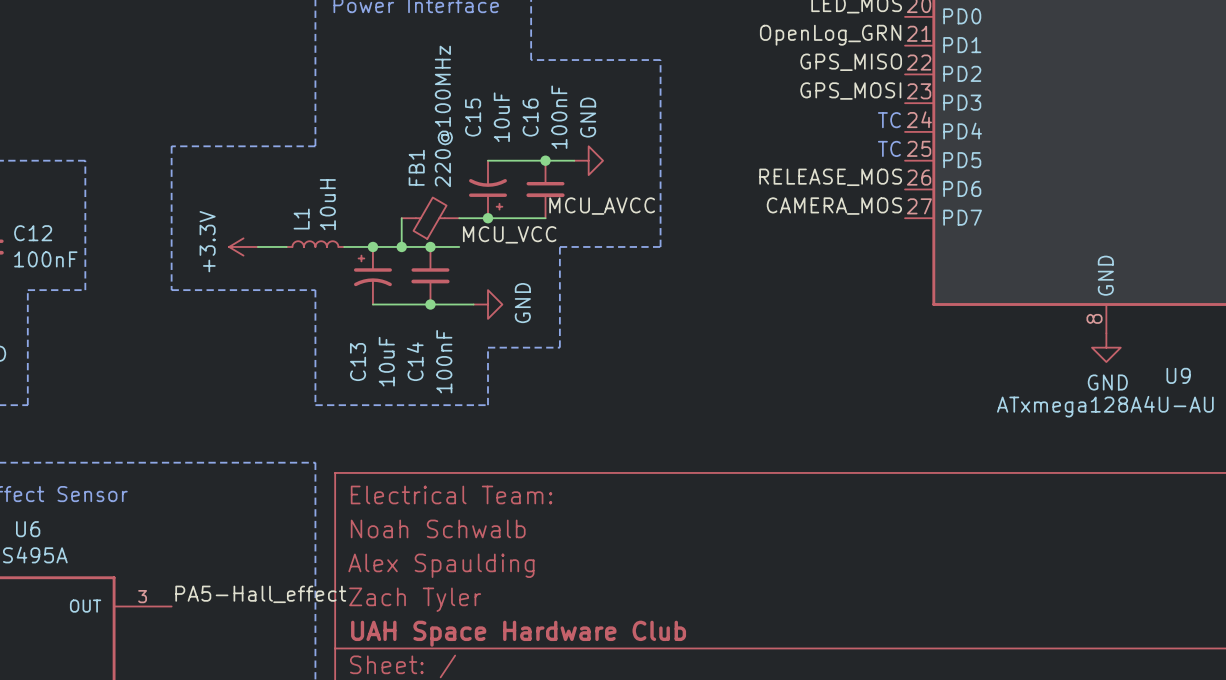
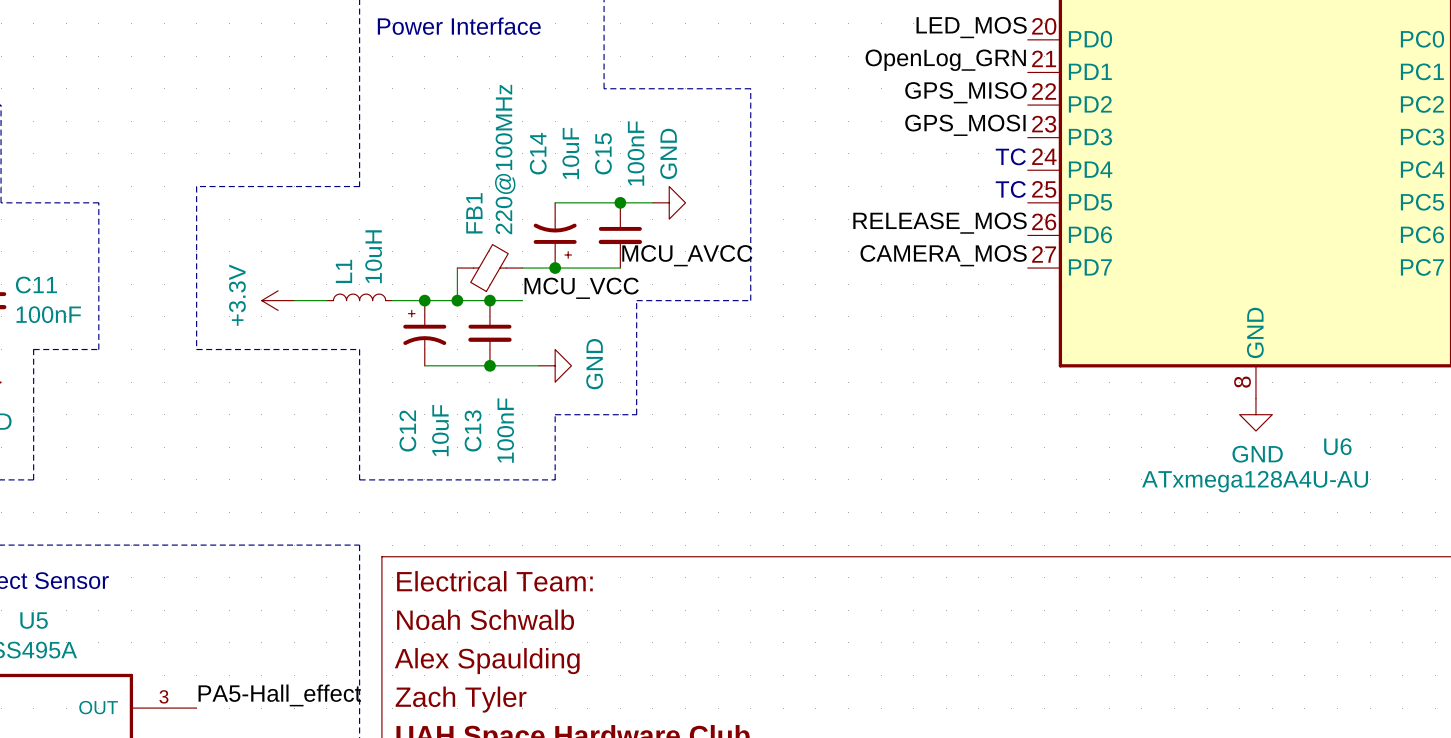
C15 name: C15 (473, 117) -> C14 (538, 153)
C16 name: C16 (530, 117) -> C15 (603, 153)
C12 name: C12 (33, 233) -> C11 (36, 285)
C14 name: C14 (415, 361) -> C13 (473, 430)
C13 name: C13 (358, 362) -> C12 (407, 431)
U9 name: U9 (1178, 375) -> U6 (1337, 446)
U6 name: U6 (28, 529) -> U5 (34, 620)

